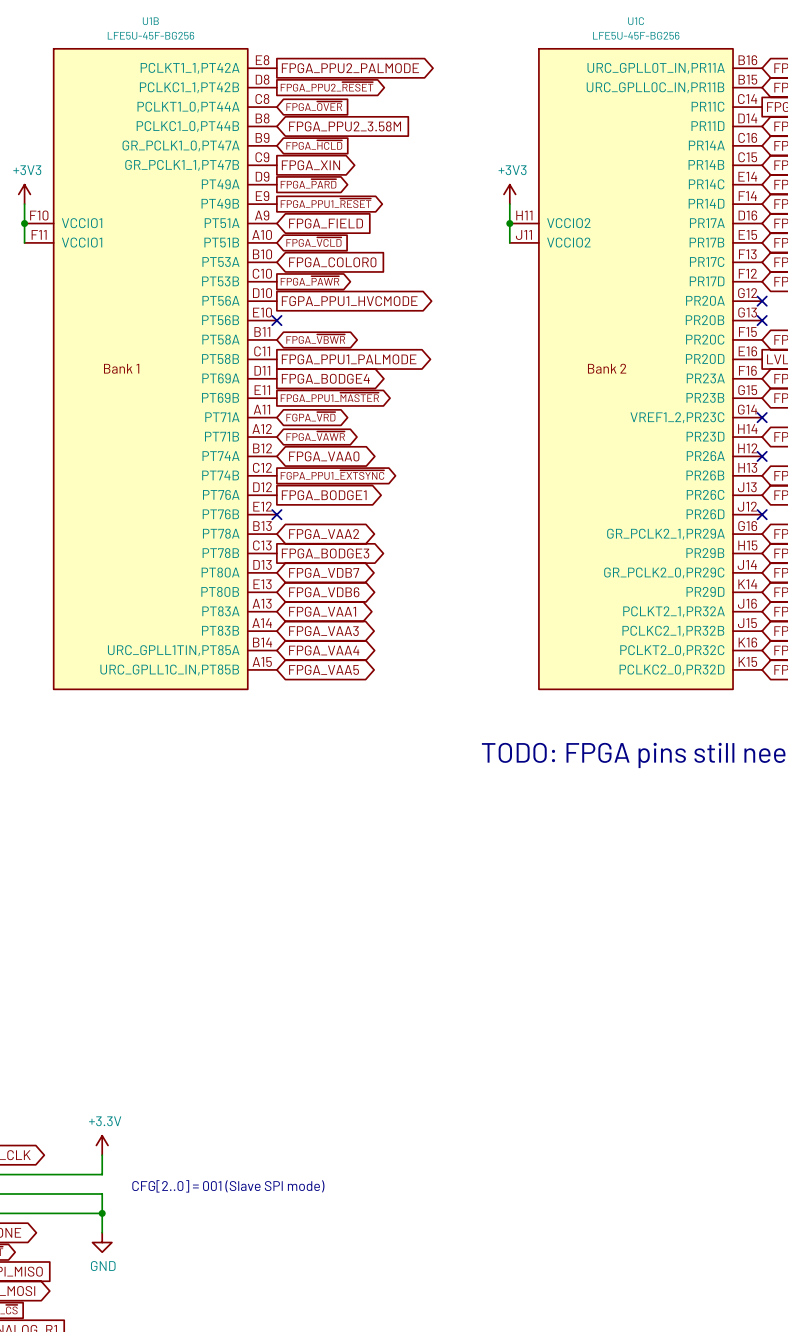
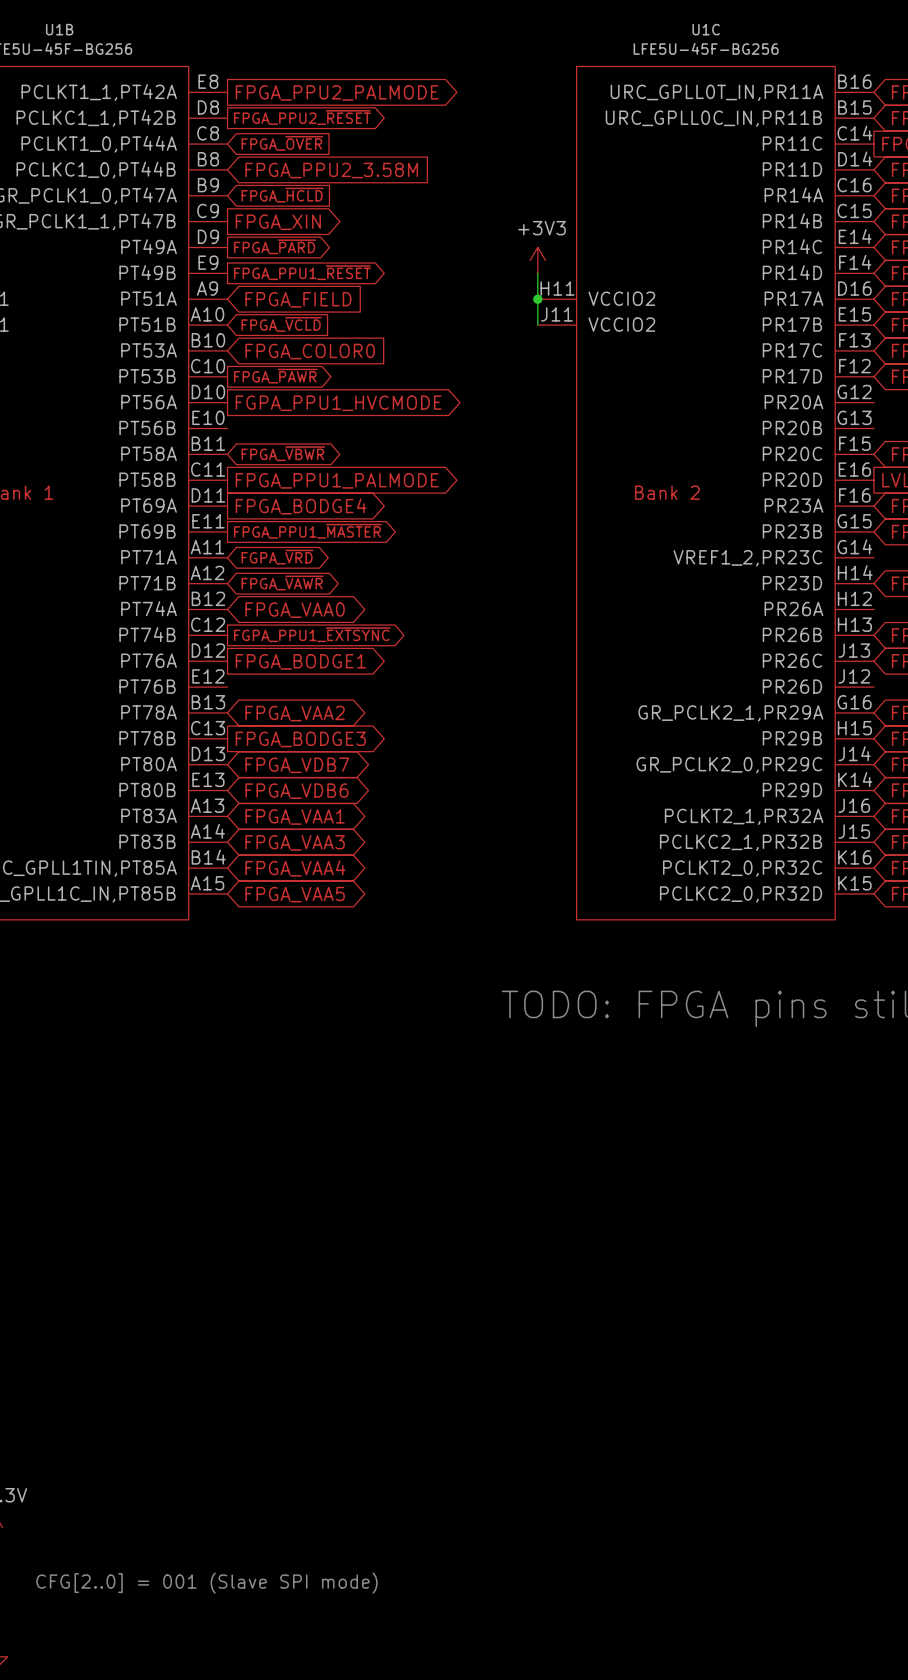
no-connect mark: (762, 301) -> none
no-connect mark: (276, 320) -> none
no-connect mark: (762, 320) -> none
no-connect mark: (762, 417) -> none
no-connect mark: (762, 456) -> none
no-connect mark: (276, 514) -> none
no-connect mark: (762, 514) -> none

